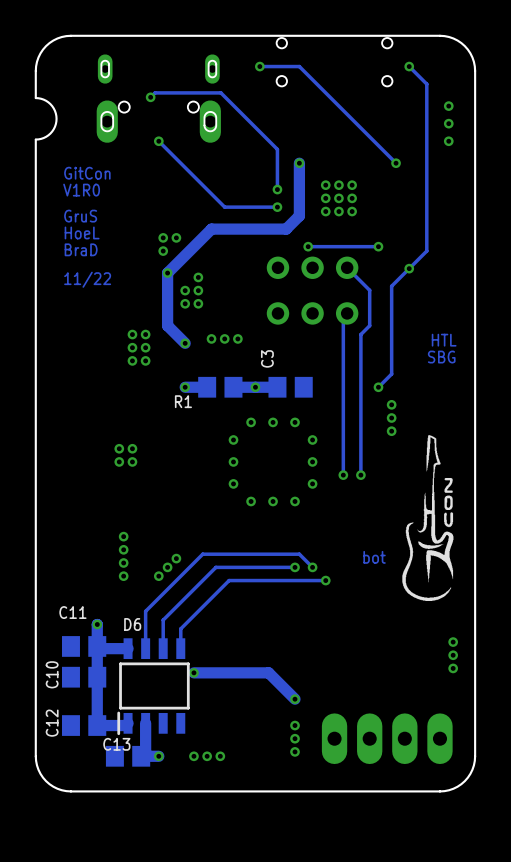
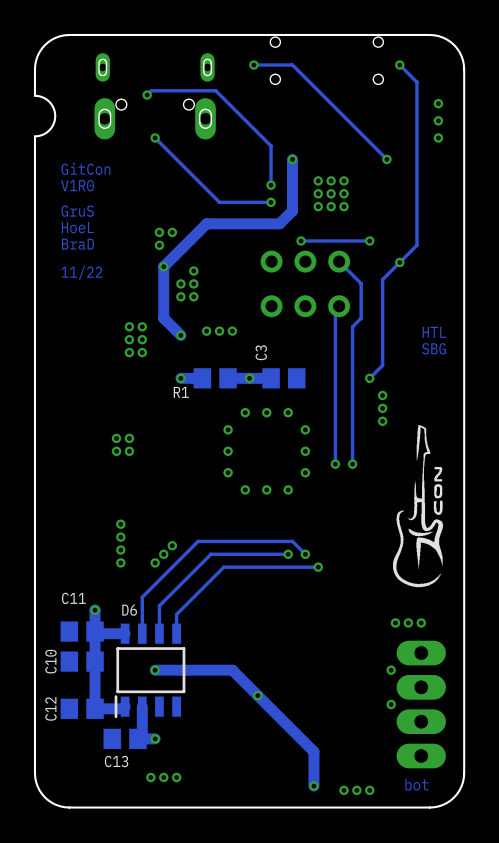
text position: bot (374, 557) -> bot (416, 784)
via: none -> (395, 622)
via: none -> (408, 622)
via: none -> (421, 622)
via: (453, 642) -> none
via: (453, 655) -> none
via: (453, 668) -> none
track: (193, 672) (268, 672) (295, 699) -> none
via position: (193, 672) -> (155, 670)
track: none -> (155, 670) (232, 670) (313, 751) (313, 786)
via: none -> (391, 670)
via: (295, 699) -> none
via: none -> (257, 695)
via: none -> (391, 704)
via: (295, 725) -> none
via: (295, 738) -> none
part rotation: 0° (387, 738) -> 90° clockwise (421, 704)
C13 name position: C13 (116, 744) -> C13 (116, 761)
via: (295, 751) -> none
via: (193, 756) -> none
via: (207, 756) -> none
via: (220, 756) -> none
board edge: (475, 756) (472, 769) (464, 781) (453, 788) (439, 791) (66, 791) (57, 788) (46, 781) (38, 769) (35, 756) -> (464, 738) (463, 777) (459, 790) (447, 802) (429, 807) (64, 807) (48, 800) (37, 786) (34, 773) (34, 738)
via: none -> (150, 777)
via: none -> (163, 777)
via: none -> (176, 777)
via: none -> (313, 786)
via: none -> (344, 790)
via: none -> (356, 790)
via: none -> (369, 790)

